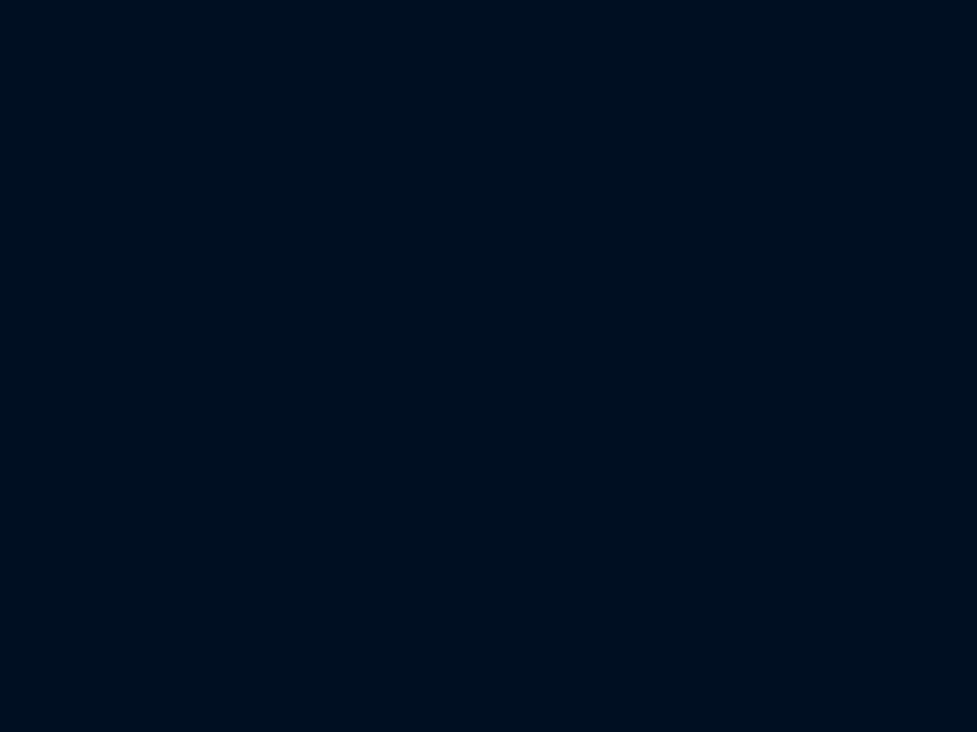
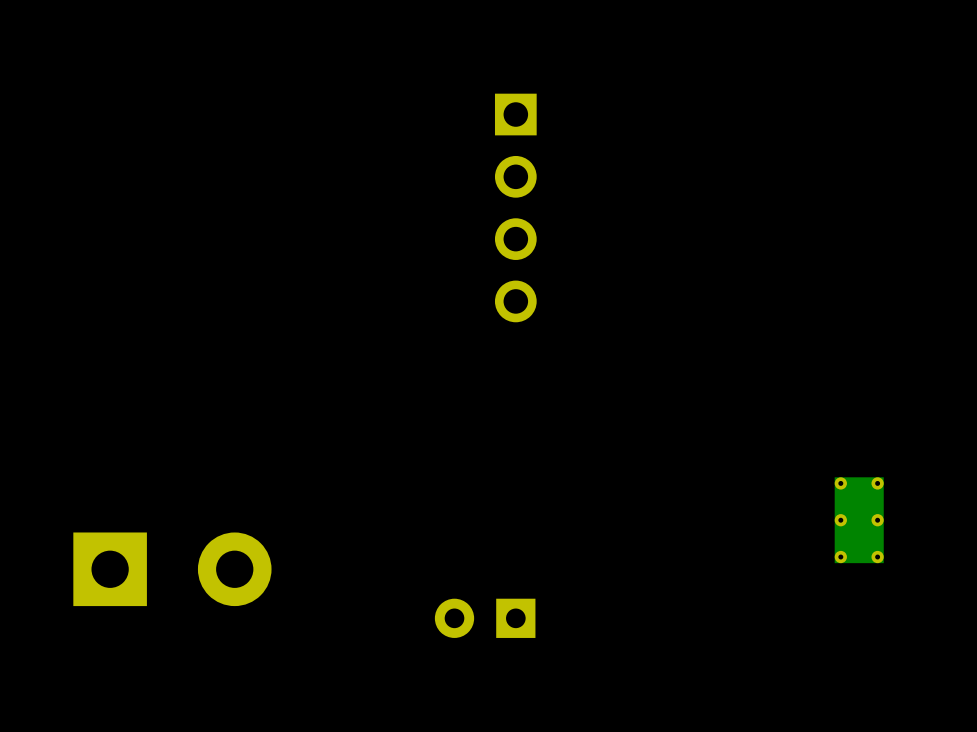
part: none -> (515, 207)
part: none -> (859, 520)
part: none -> (172, 569)
part: none -> (485, 618)

